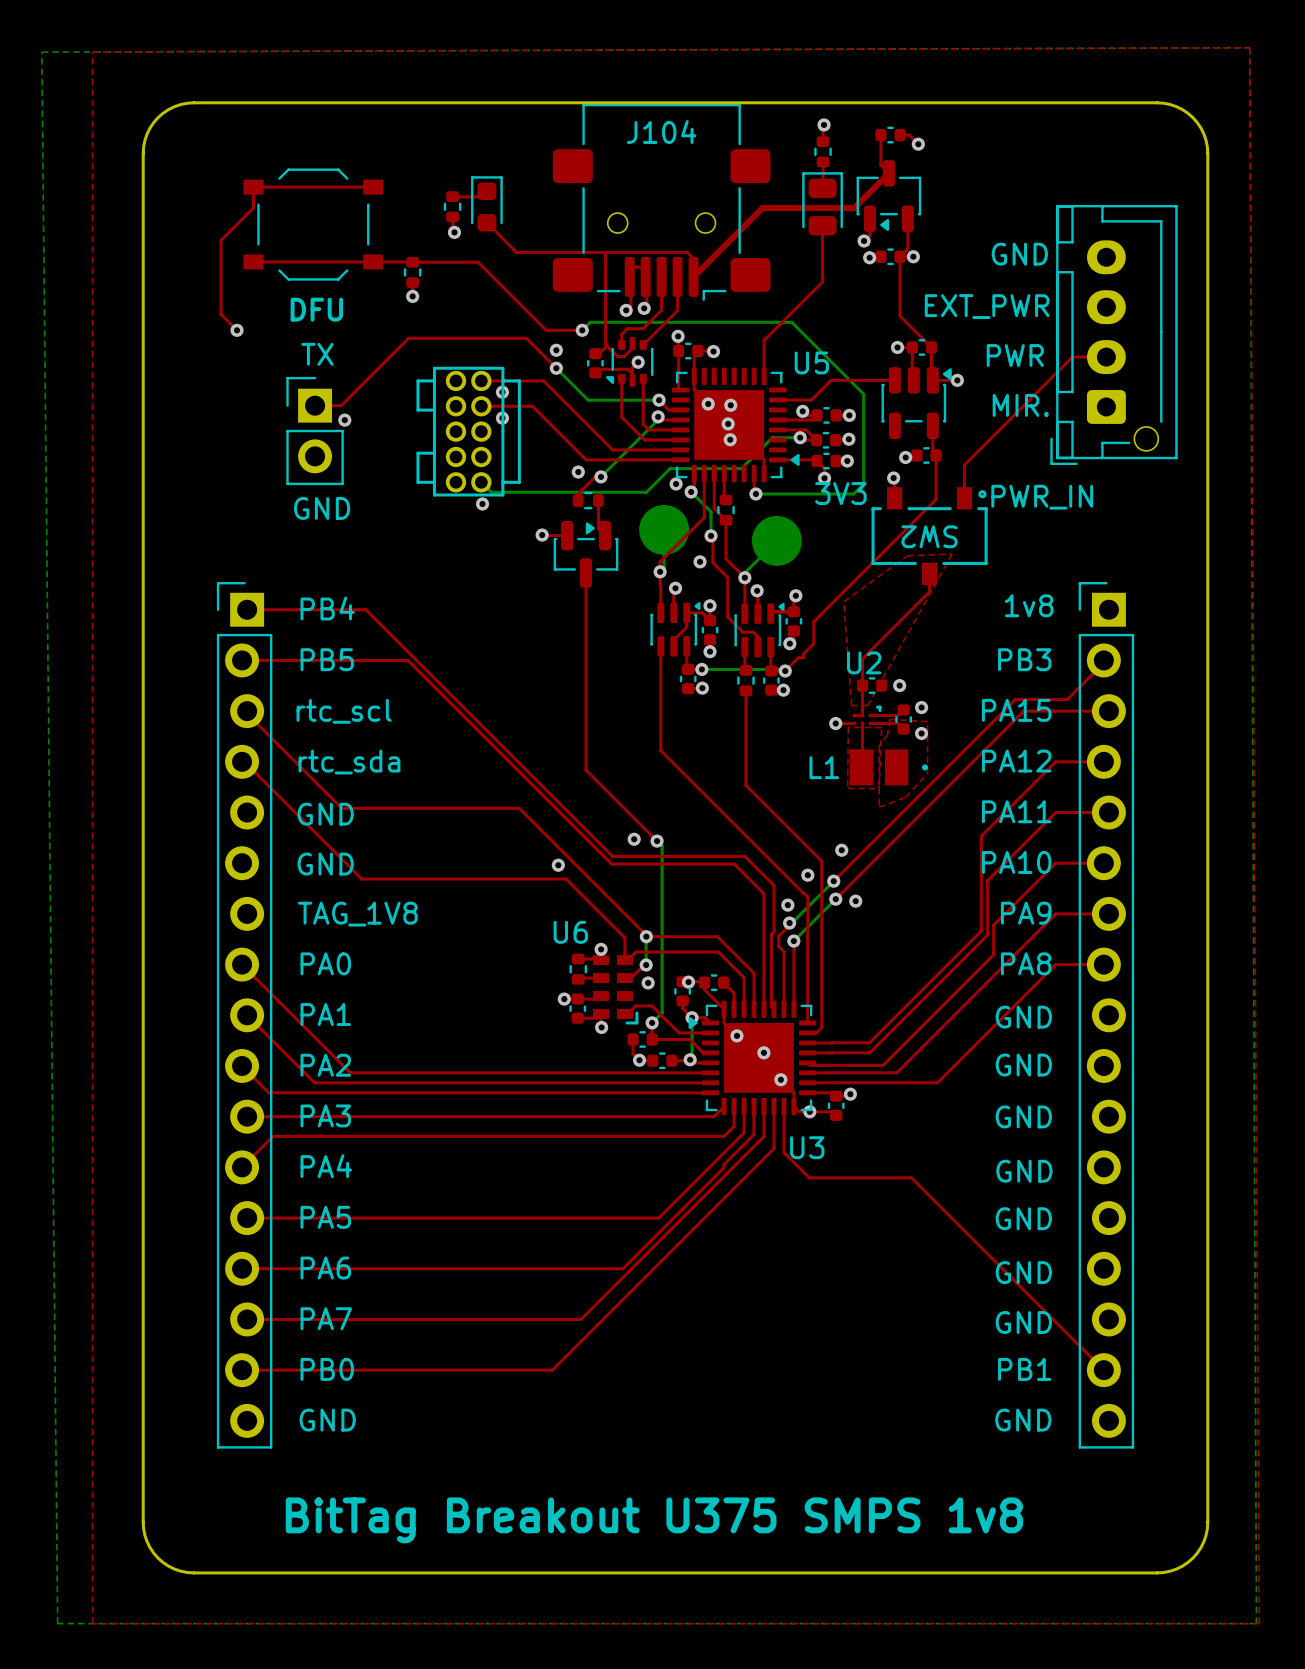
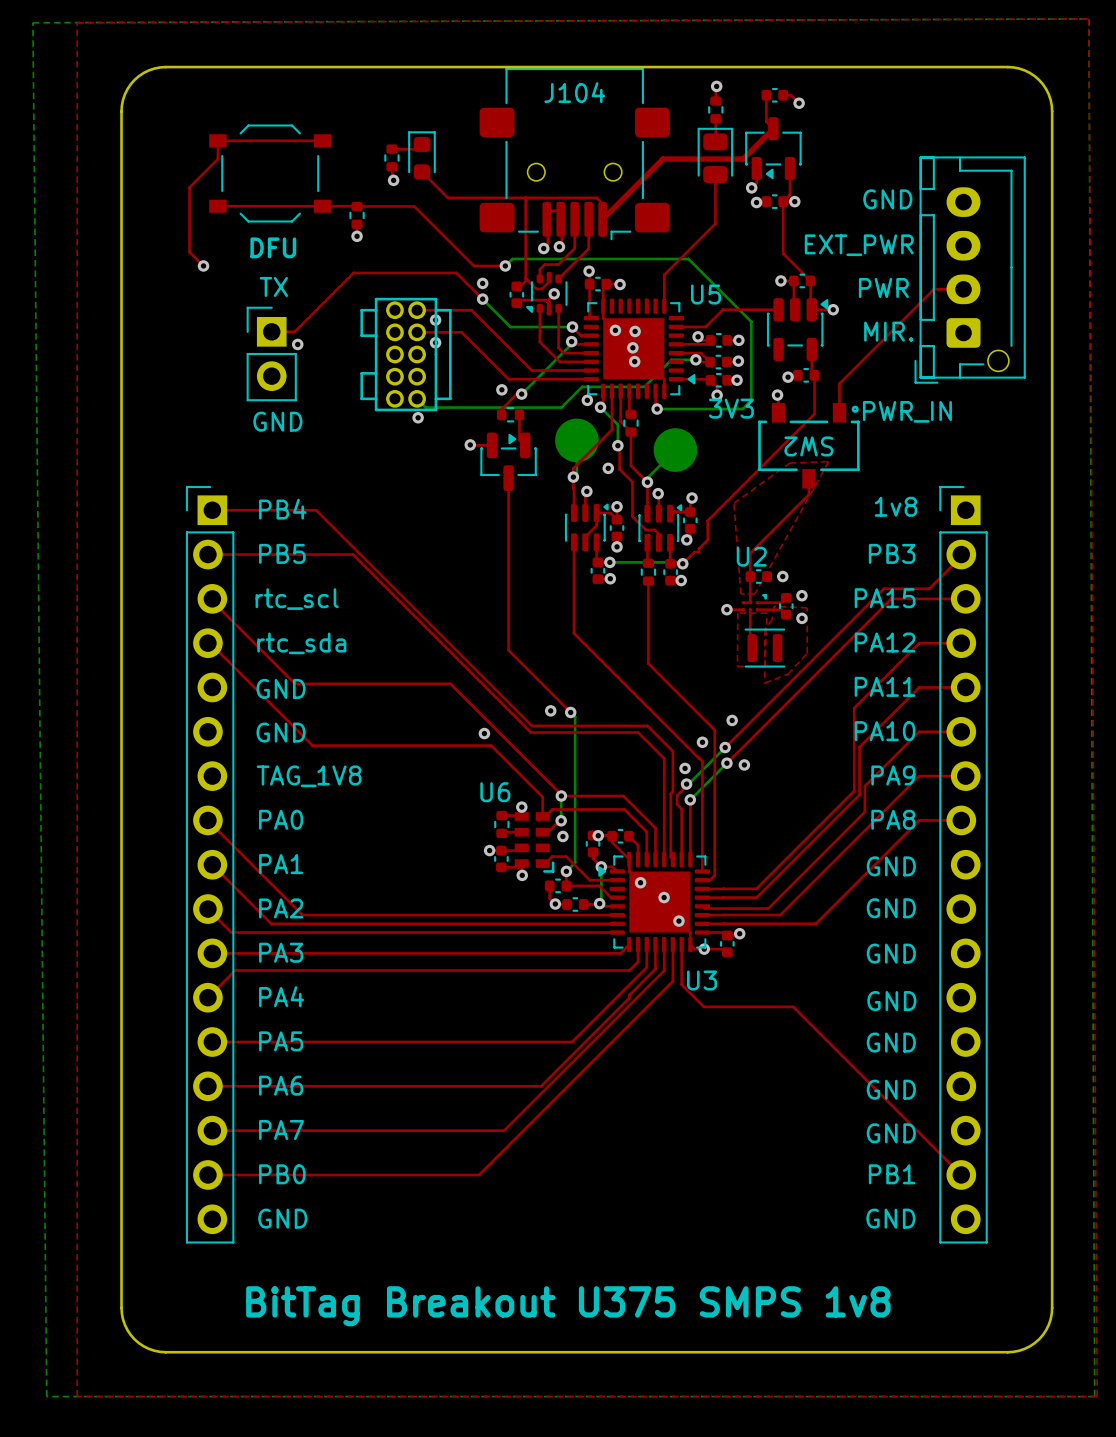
part: none -> (764, 648)
L1: (889, 767) -> none

